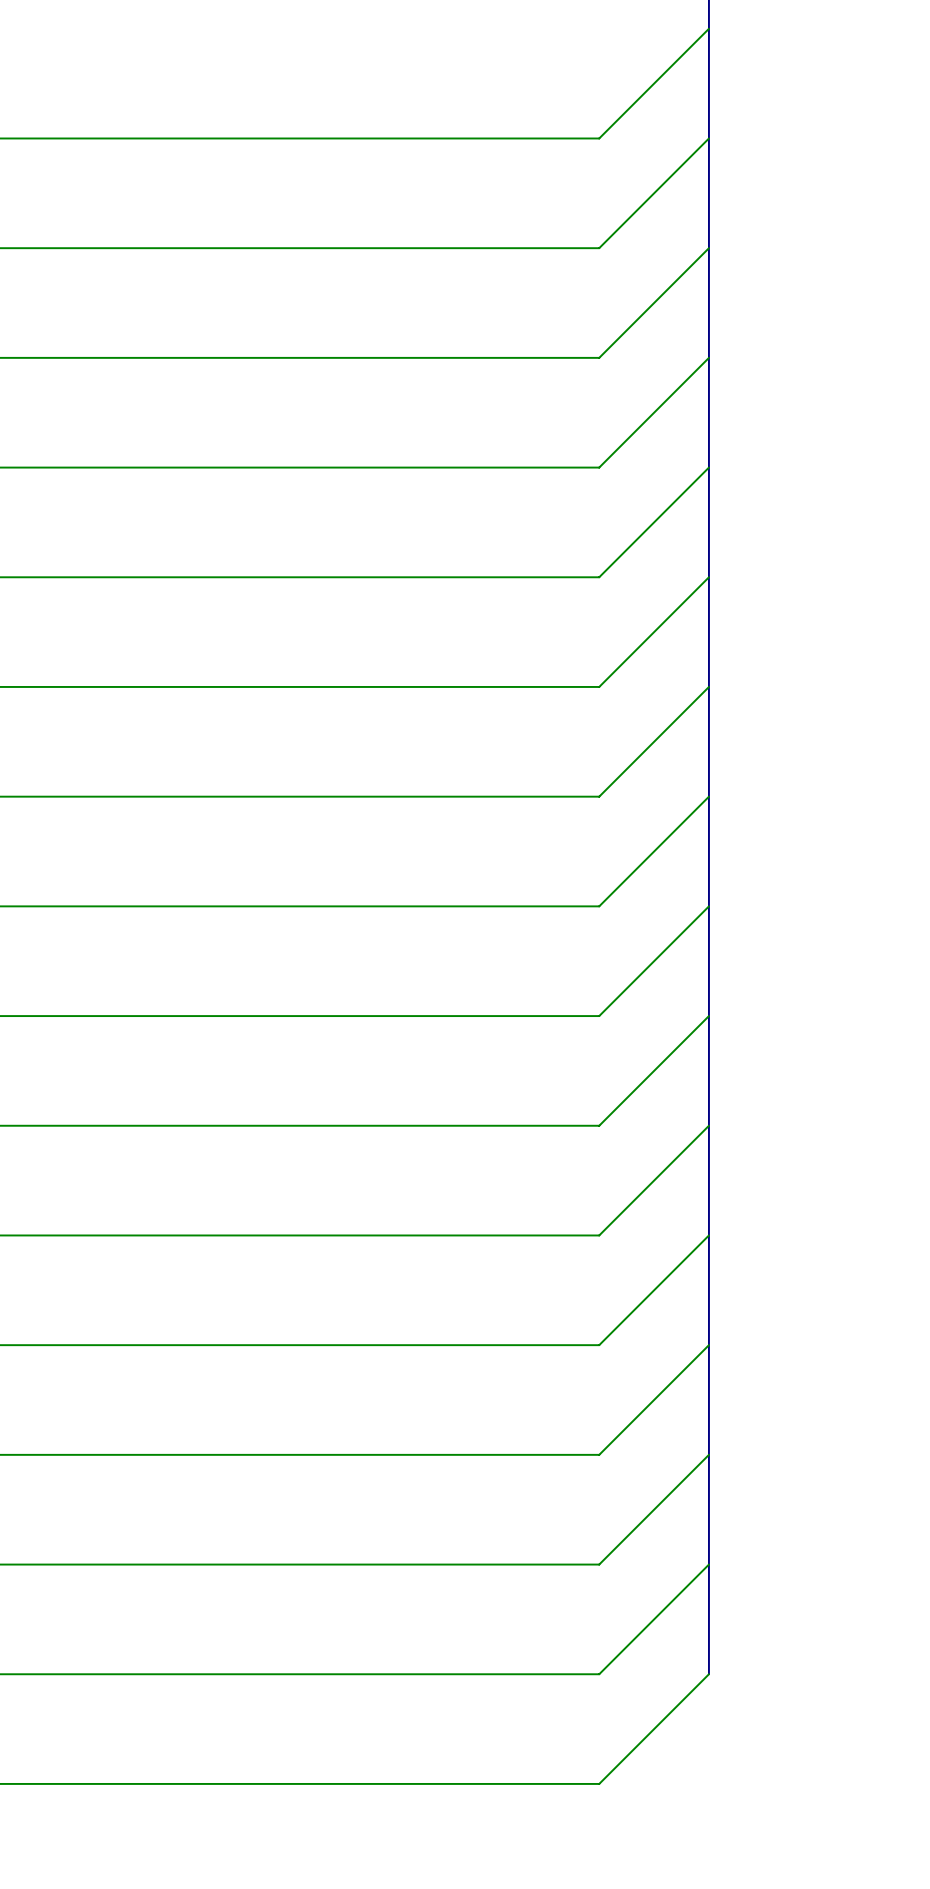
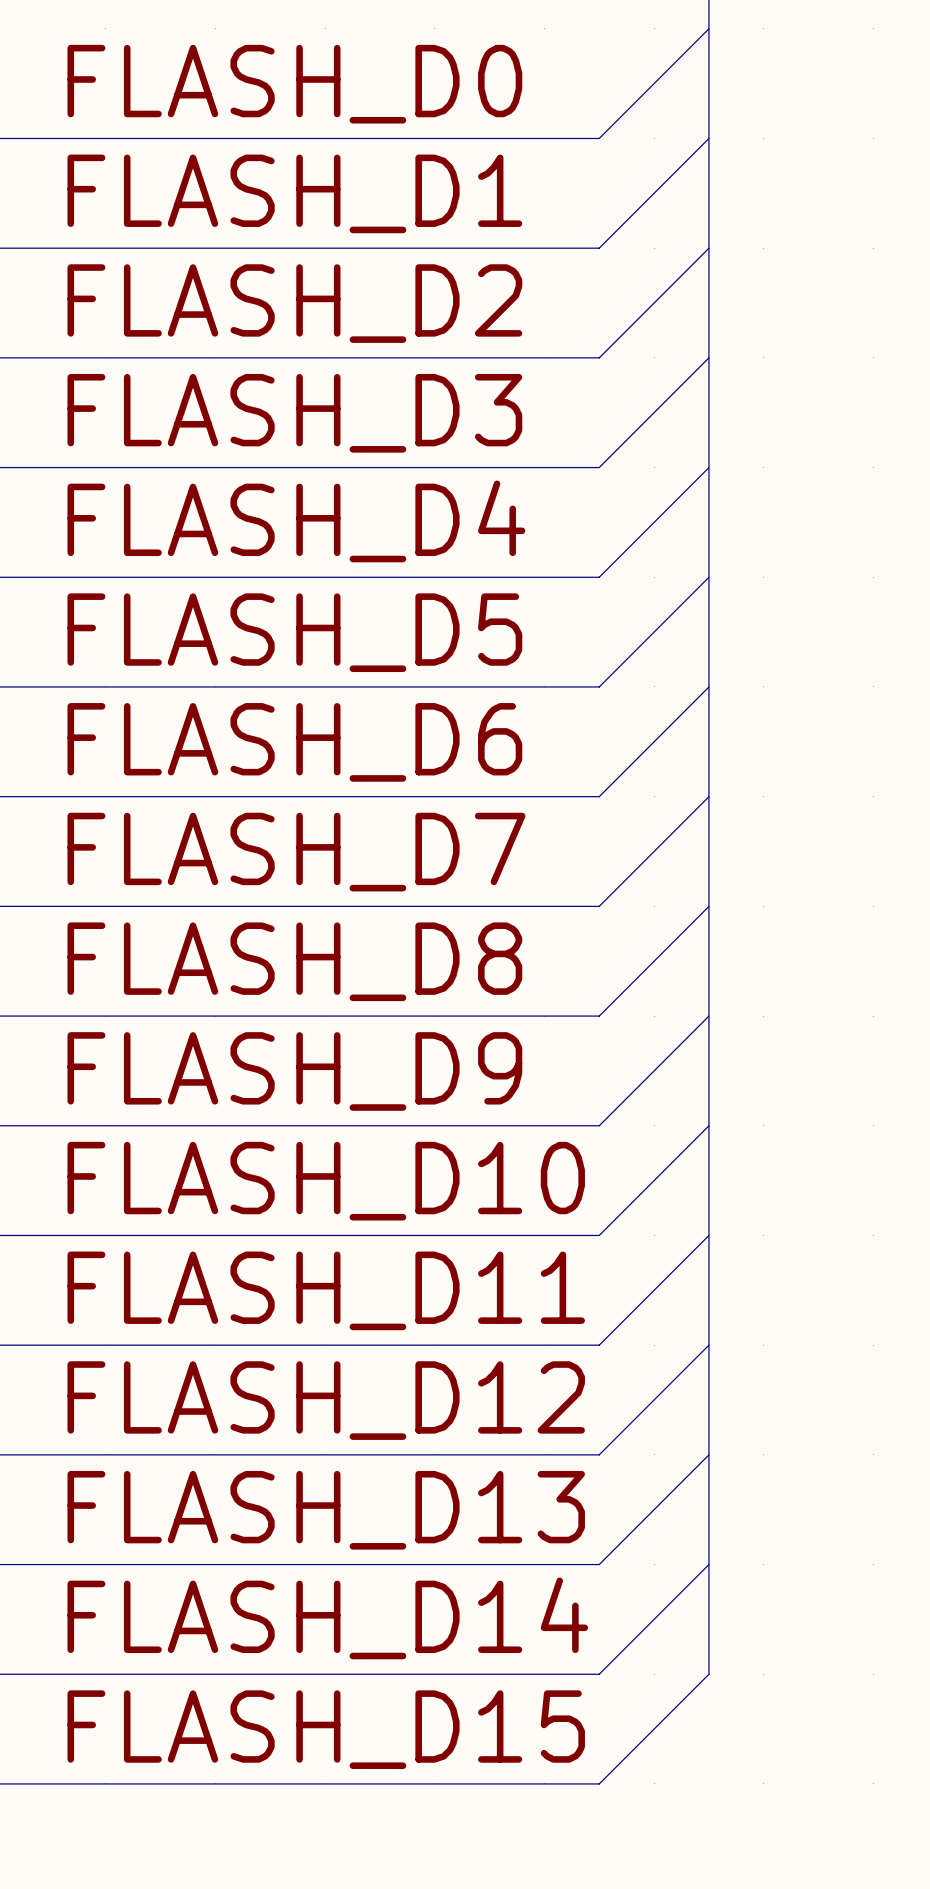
label: none -> FLASH_D0 (294, 84)
label: none -> FLASH_D1 (294, 193)
label: none -> FLASH_D2 (294, 303)
label: none -> FLASH_D3 (294, 413)
label: none -> FLASH_D4 (296, 521)
label: none -> FLASH_D5 (294, 632)
label: none -> FLASH_D6 (294, 742)
label: none -> FLASH_D7 (296, 852)
label: none -> FLASH_D8 (294, 961)
label: none -> FLASH_D9 (294, 1071)
label: none -> FLASH_D10 (326, 1181)
label: none -> FLASH_D11 (326, 1290)
label: none -> FLASH_D12 (326, 1400)
label: none -> FLASH_D13 (326, 1510)
label: none -> FLASH_D14 (327, 1618)
label: none -> FLASH_D15 (326, 1729)

